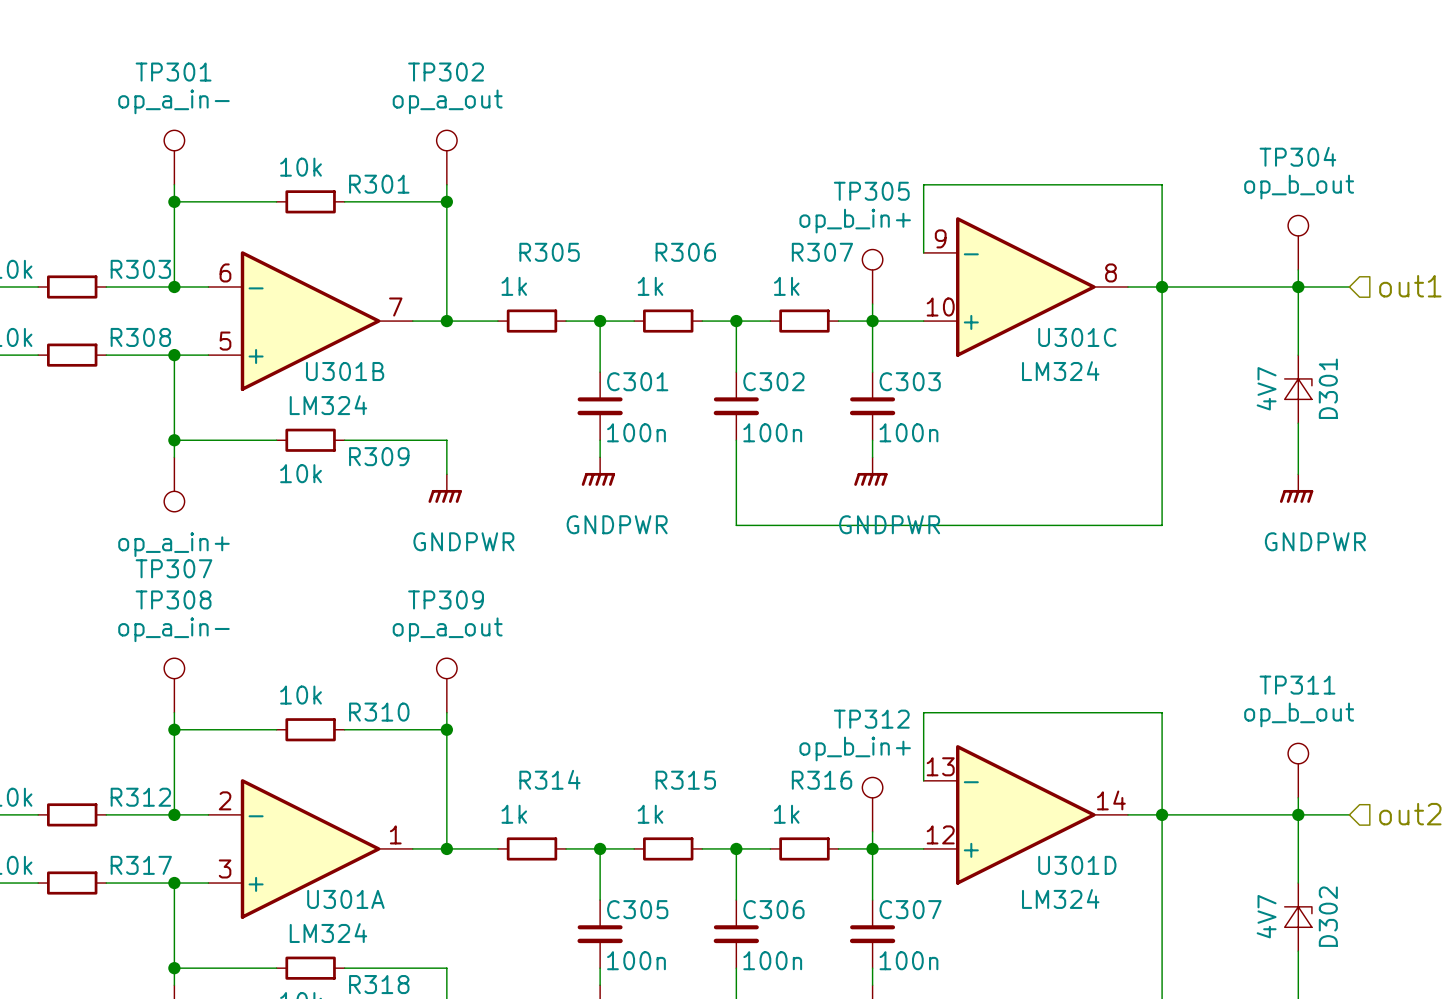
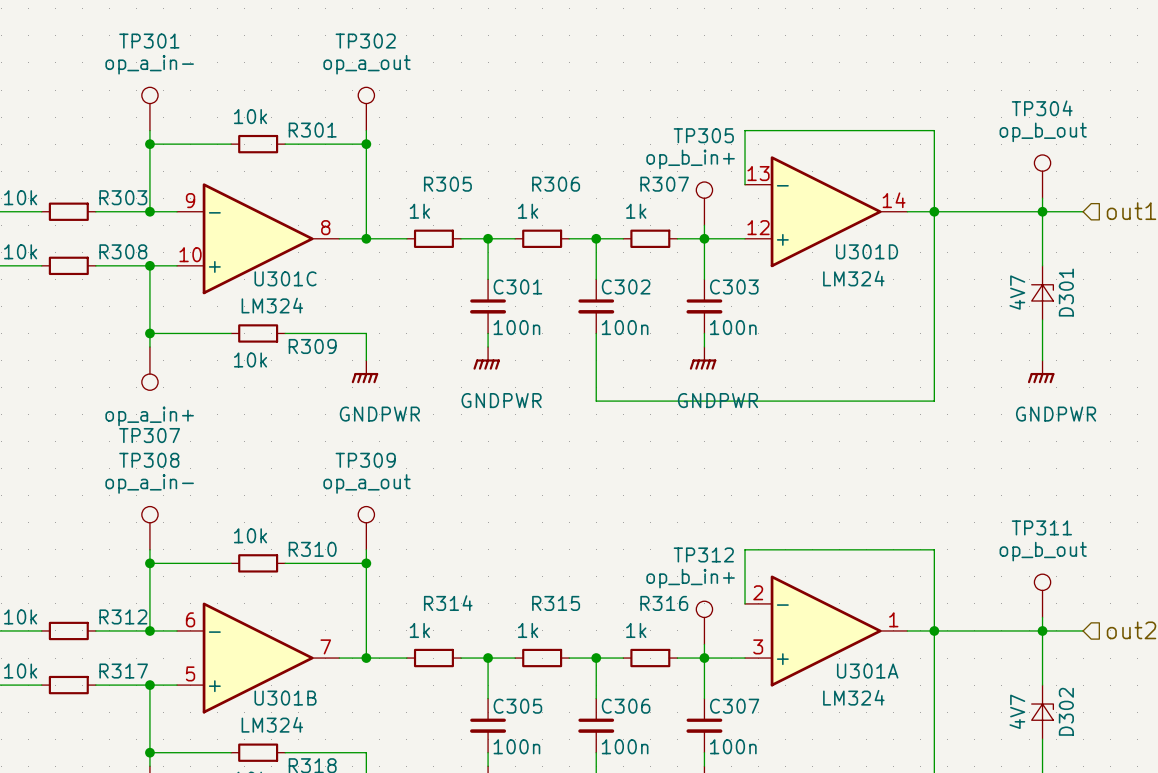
U301C position: (1025, 286) -> (258, 238)
U301B position: (310, 321) -> (258, 658)
U301C name position: U301C (1077, 337) -> U301C (285, 278)
U301D position: (1025, 814) -> (826, 211)
U301A position: (310, 848) -> (826, 630)
U301A name position: U301A (345, 899) -> U301A (867, 671)

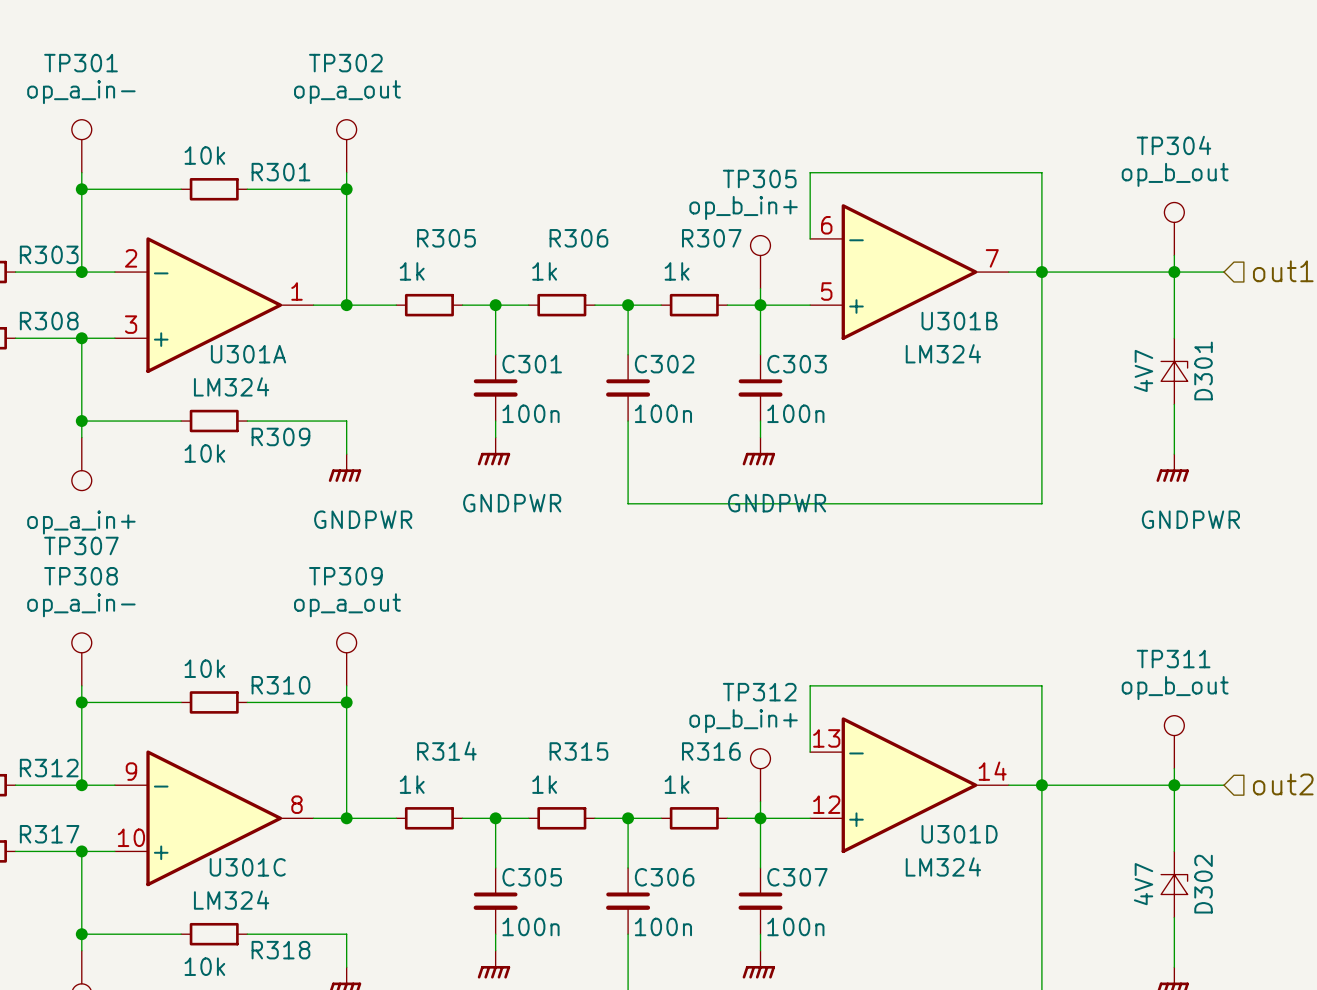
U301D position: (826, 211) -> (909, 785)
U301C position: (258, 238) -> (214, 818)
U301A position: (826, 630) -> (214, 305)
U301B position: (258, 658) -> (909, 272)
U301A name position: U301A (867, 671) -> U301A (248, 354)
U301B name position: U301B (285, 698) -> U301B (959, 321)

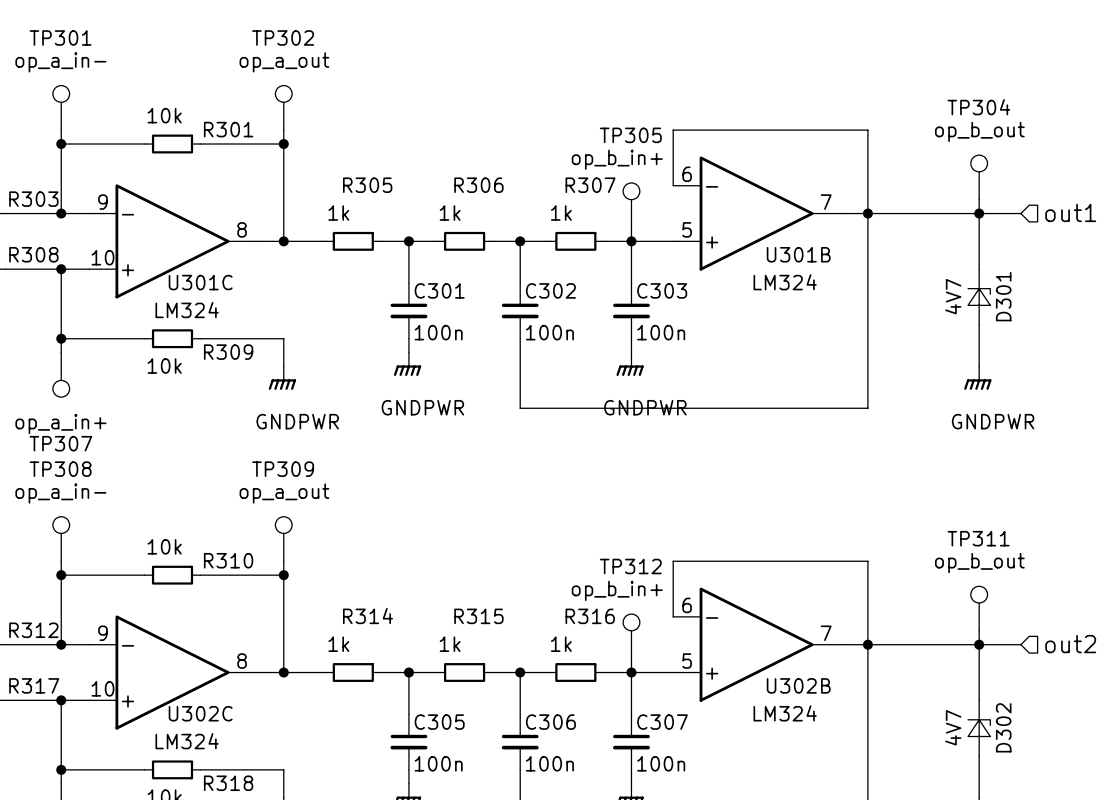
U301A pin number: 2 (131, 258) -> 9 (102, 202)
U301A pin number: 1 (296, 291) -> 8 (242, 229)
U301A pin number: 3 (131, 324) -> 10 (102, 257)
U301A name: U301A (248, 354) -> U301C (200, 282)
U301D pin number: 13 (826, 738) -> 6 (687, 605)
U301D pin number: 14 (992, 771) -> 7 (826, 633)
U301D pin number: 12 (826, 804) -> 5 (687, 661)
U301D name: U301D (959, 834) -> U302B (798, 685)
U301C name: U301C (247, 867) -> U302C (200, 713)

